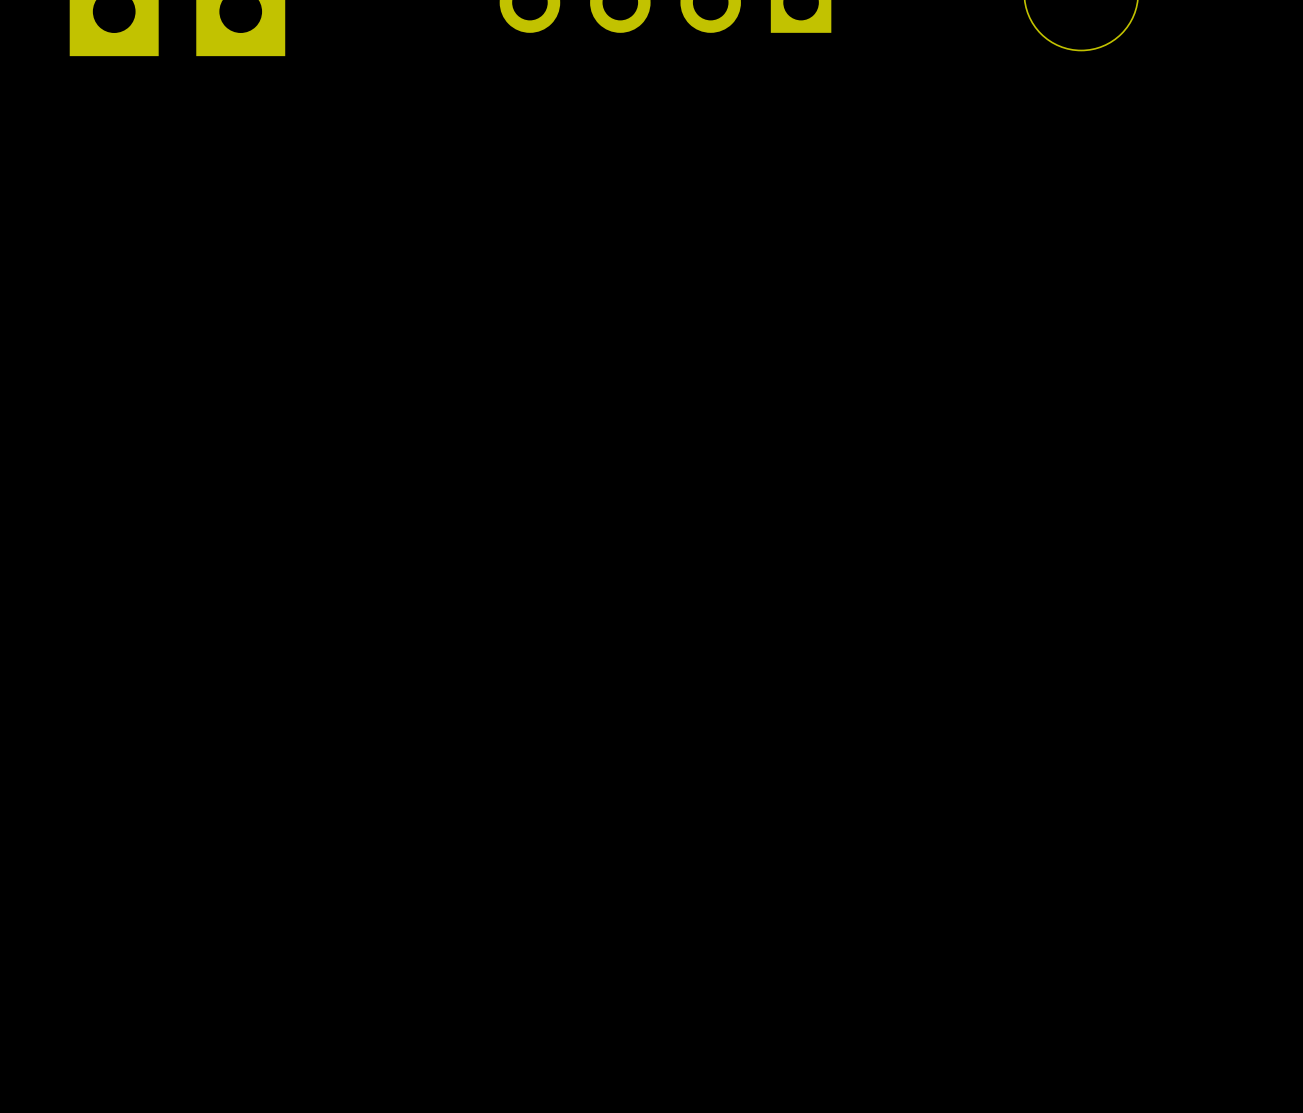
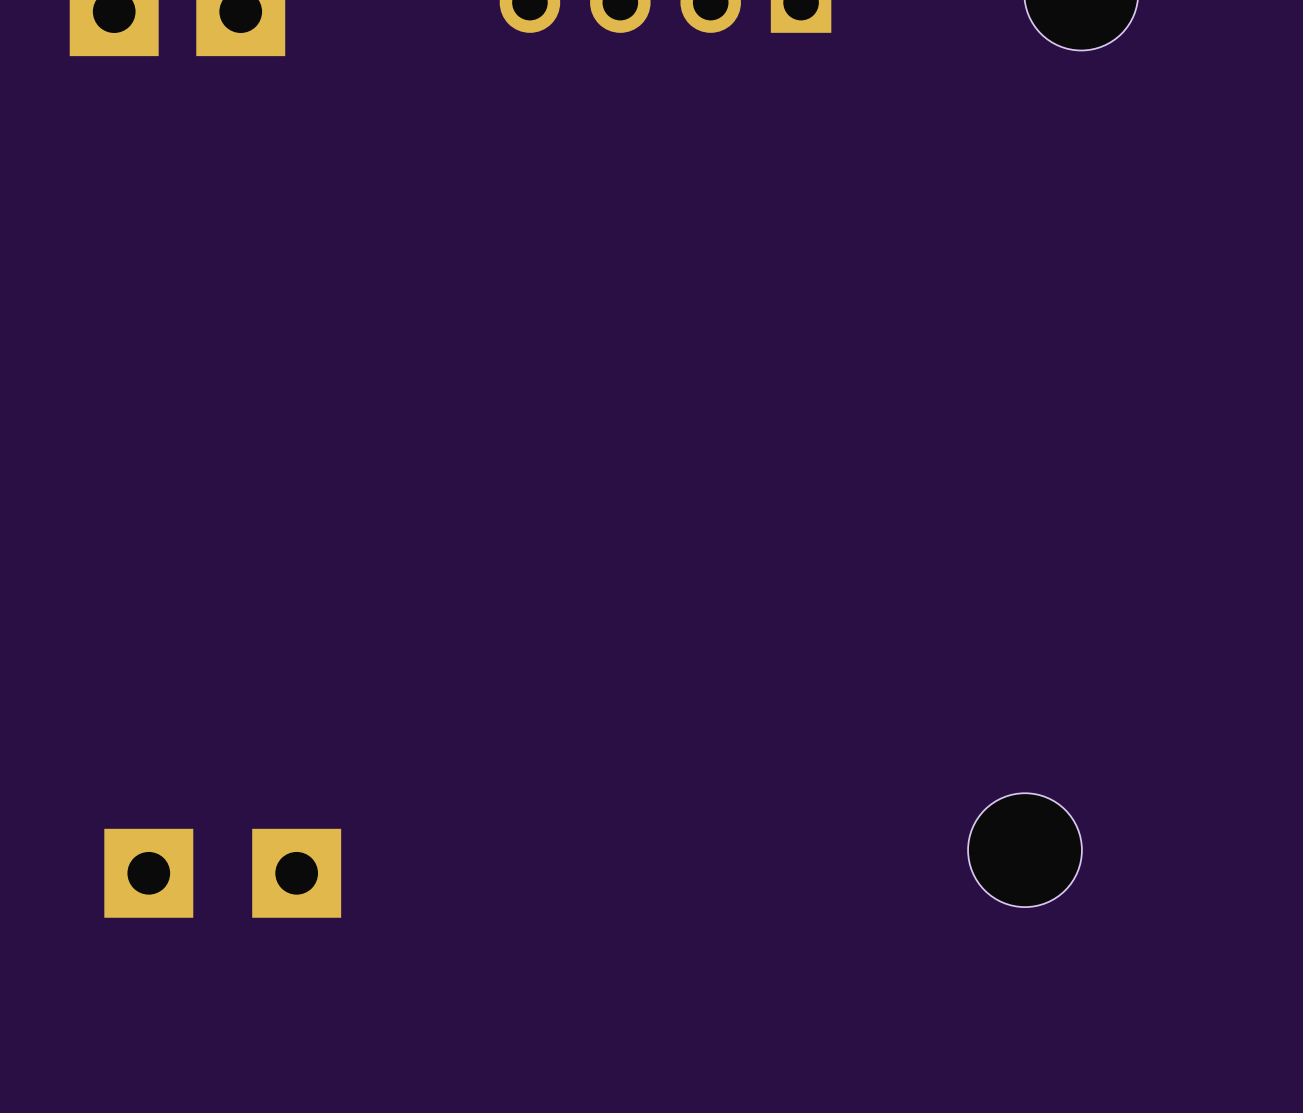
part: none -> (1024, 850)
part: none -> (148, 873)
part: none -> (296, 873)

